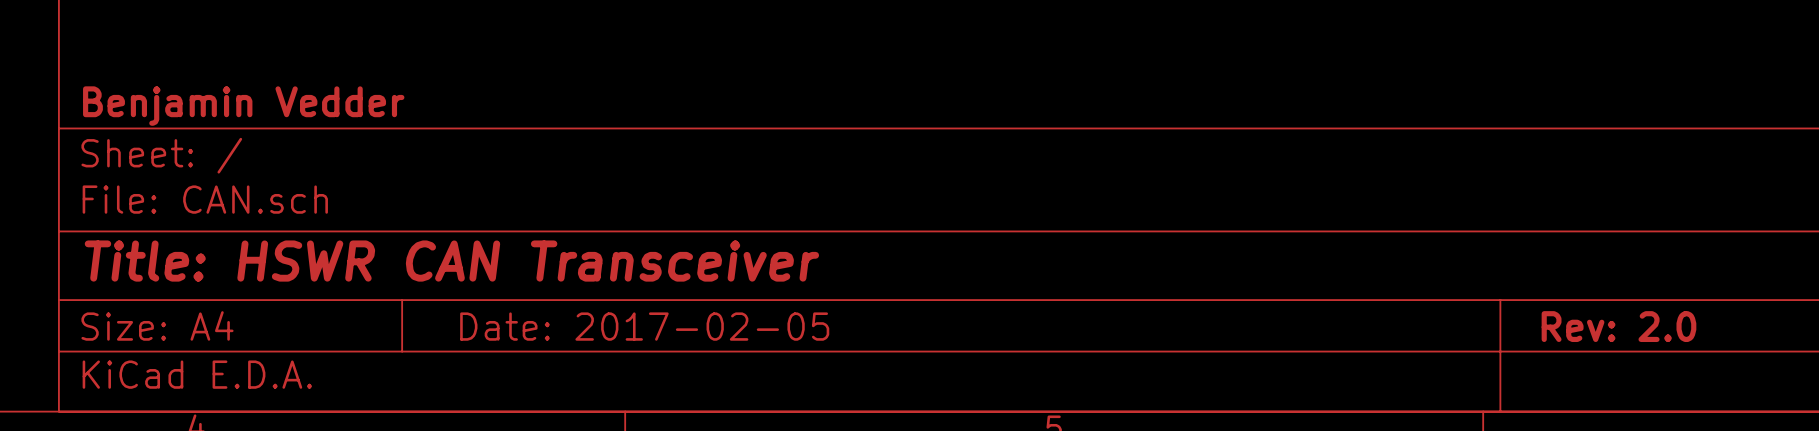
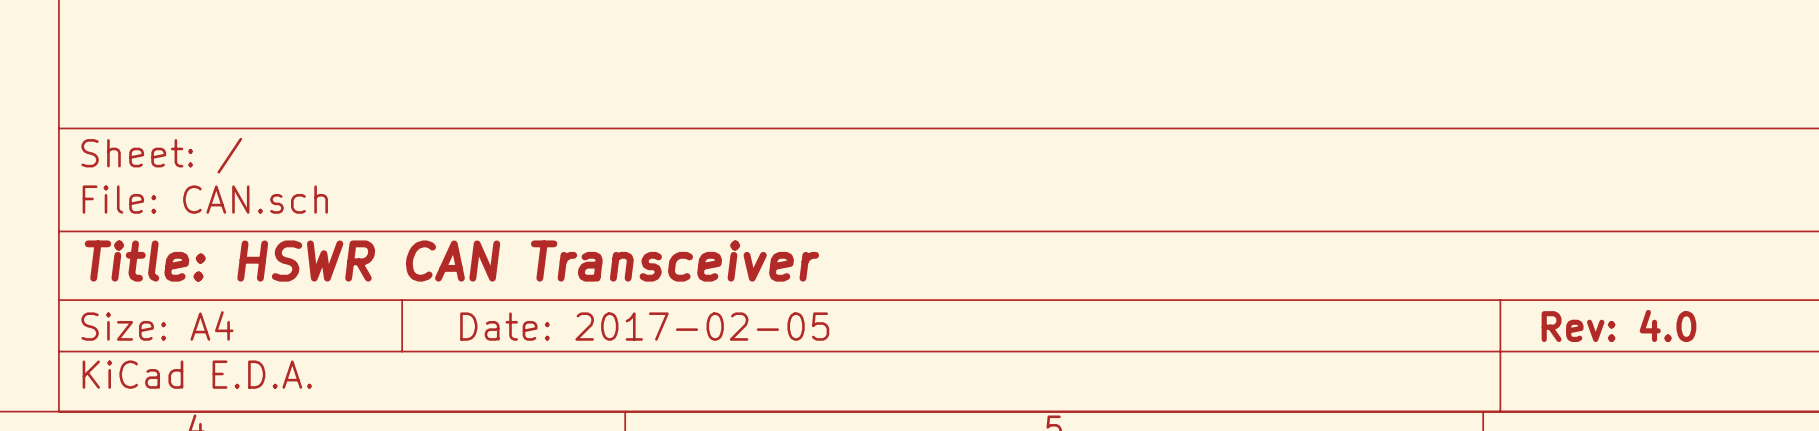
title block: Benjamin Vedder (243, 106) -> none
title block: Rev: 2.0 (1618, 326) -> Rev: 4.0 (1618, 325)

